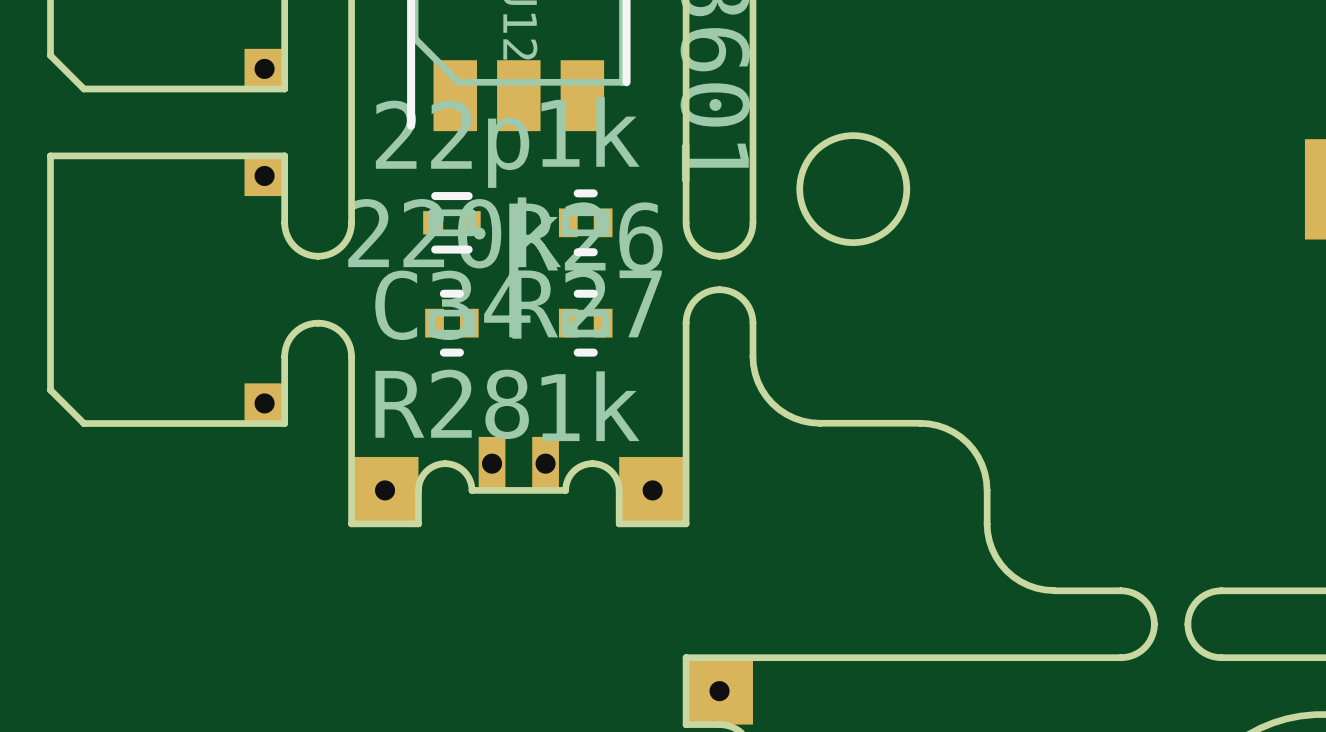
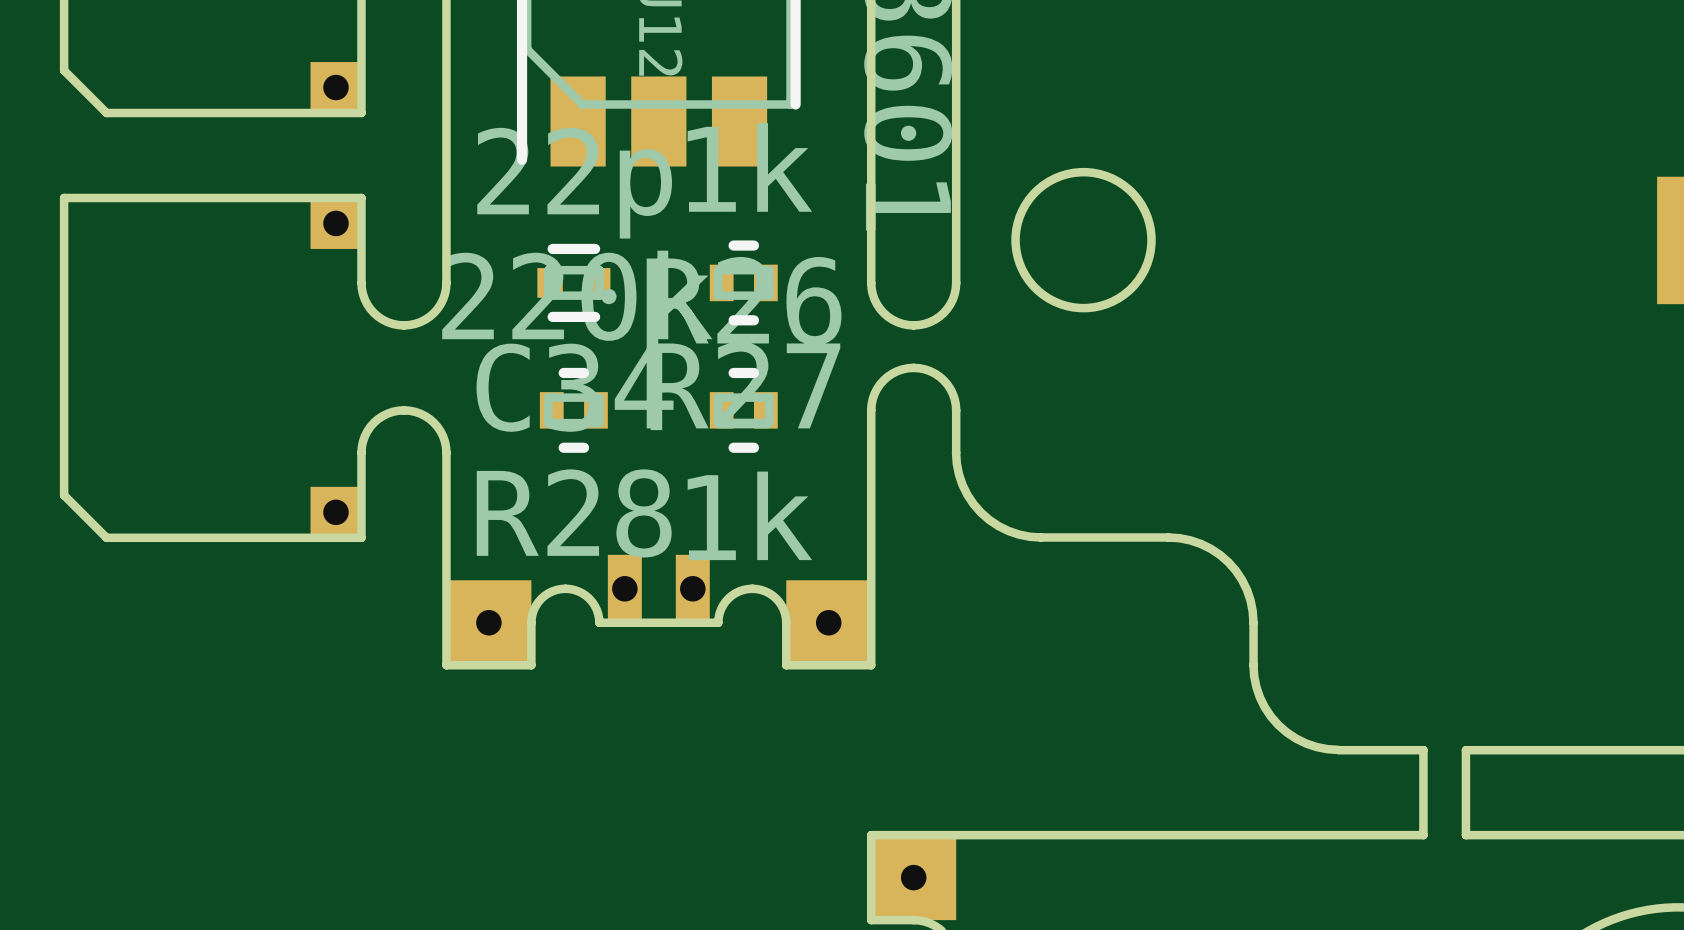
board edge: (1120, 590) (1133, 593) (1144, 600) (1151, 611) (1154, 624) (1151, 637) (1144, 647) (1133, 655) (1120, 657) -> (1423, 750) (1423, 835)
board edge: (1221, 590) (1208, 593) (1197, 600) (1190, 611) (1187, 624) (1190, 637) (1197, 647) (1208, 655) (1221, 657) -> (1550, 750) (1465, 750) (1465, 835) (1550, 835)

